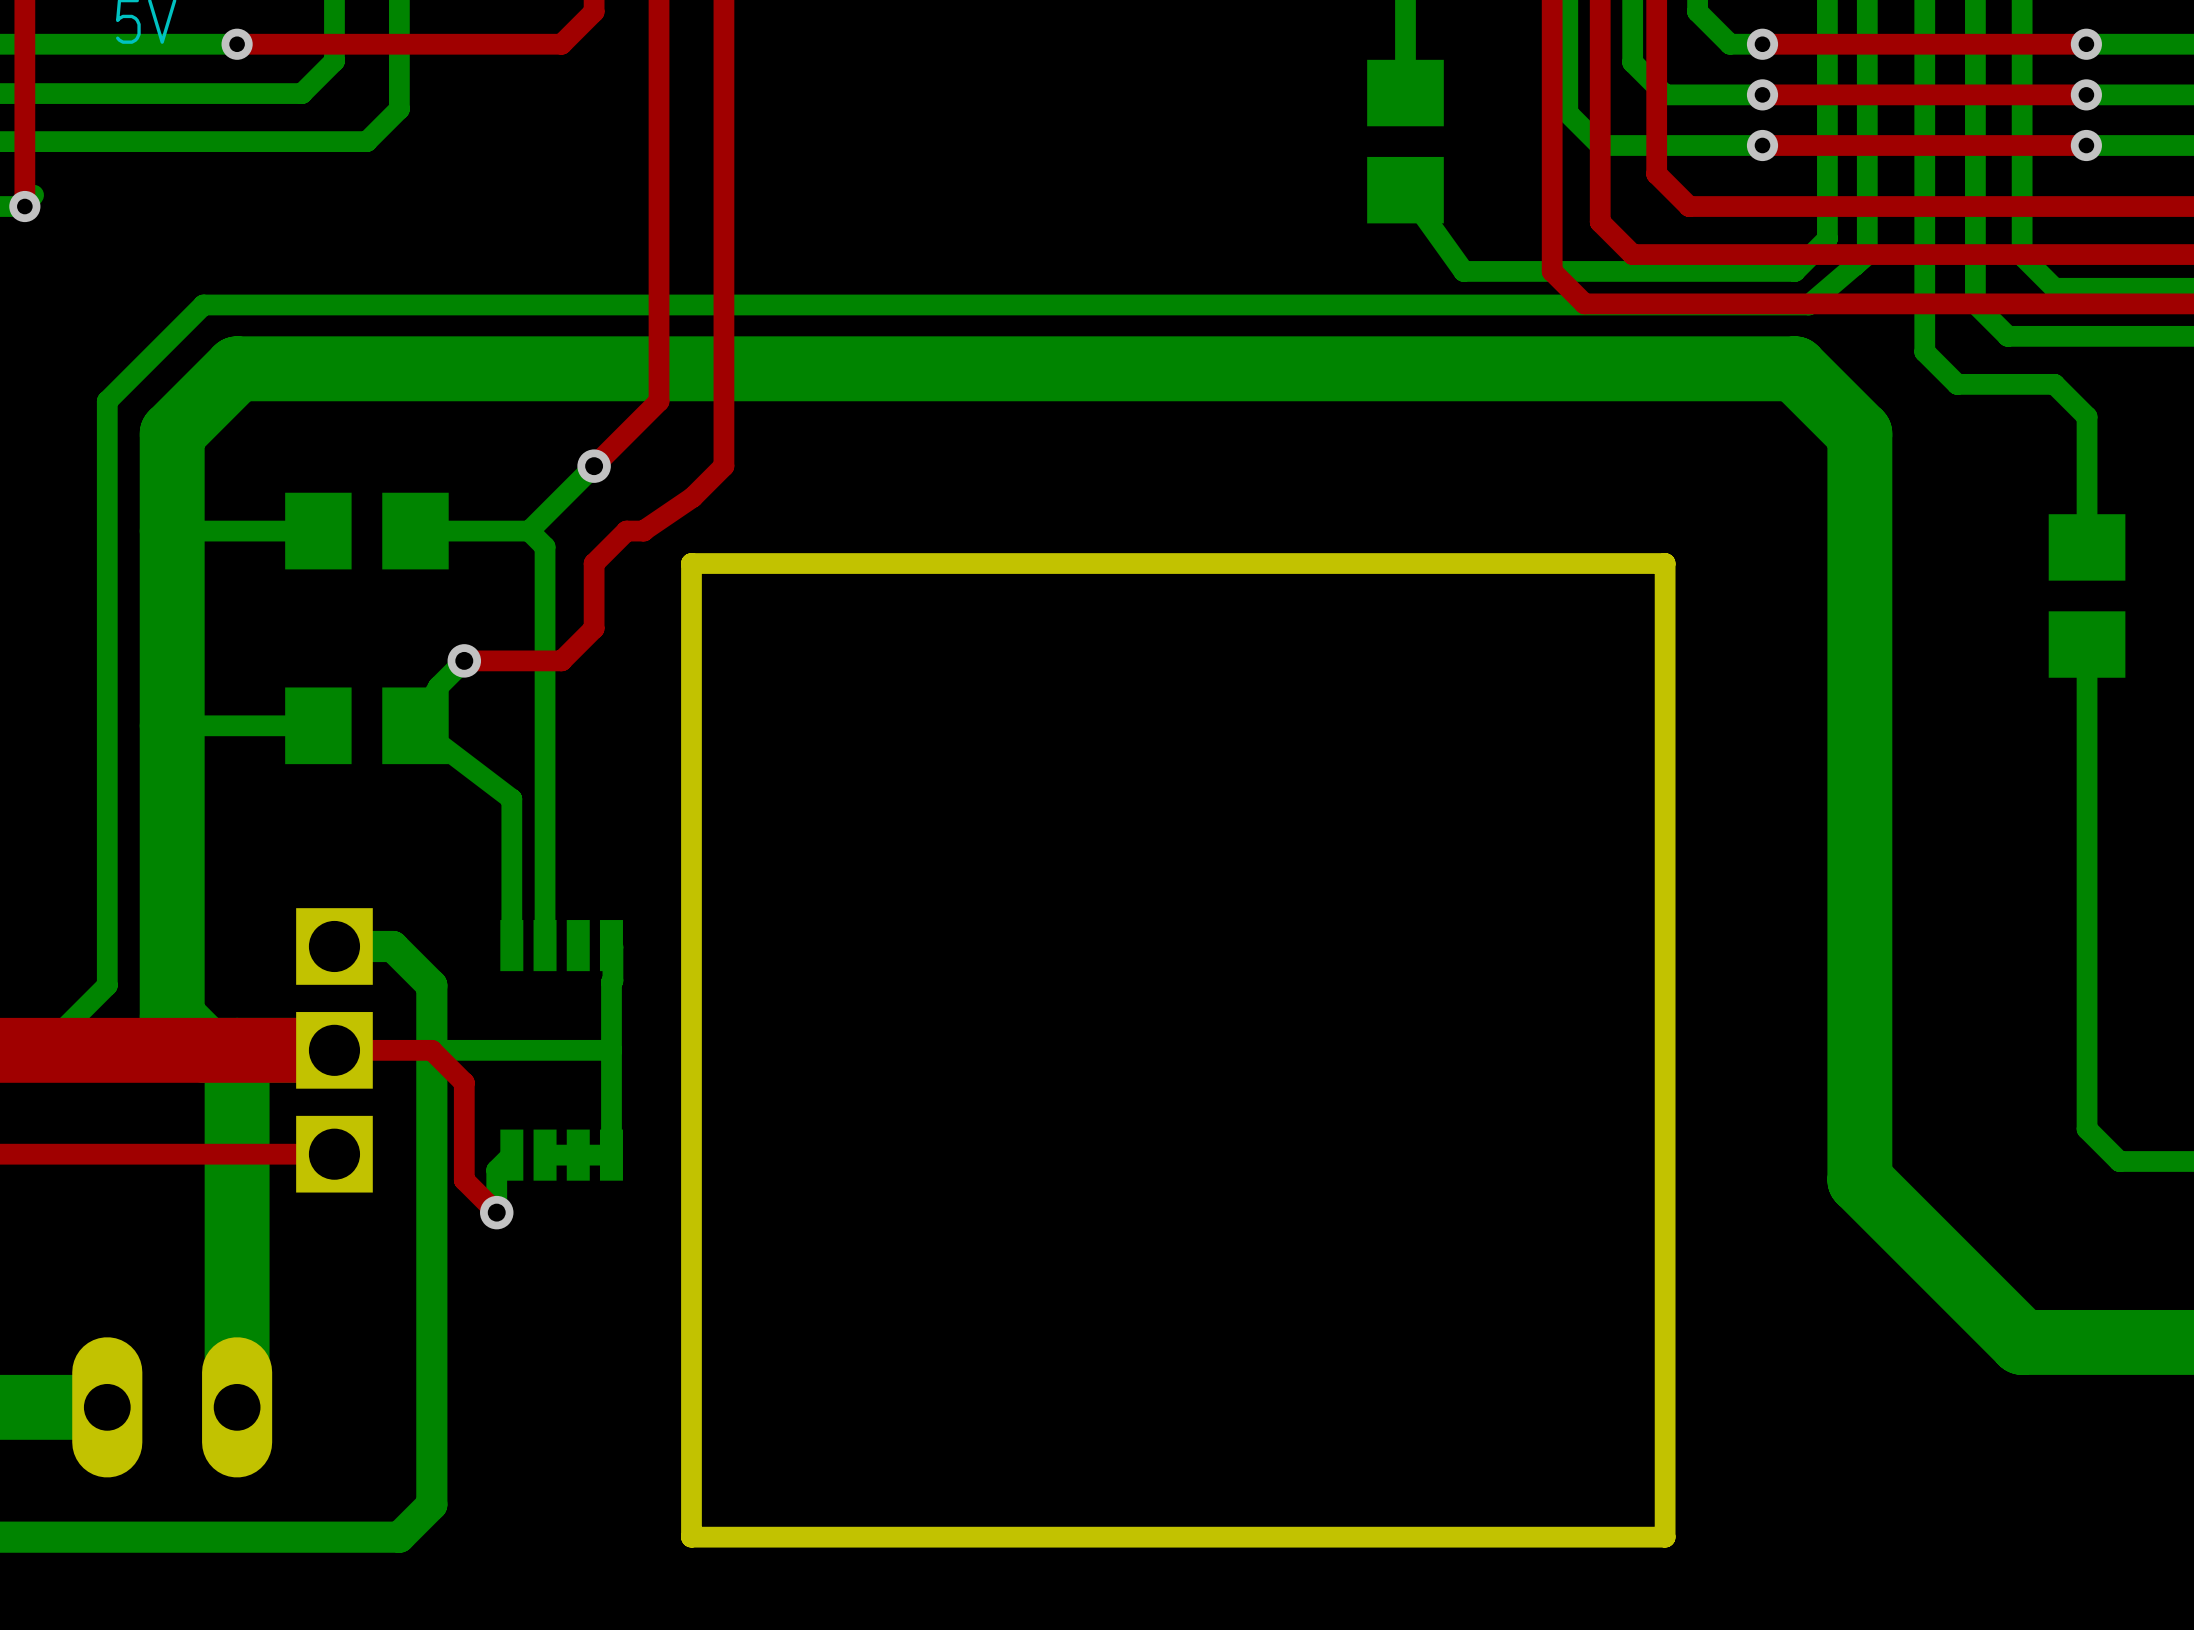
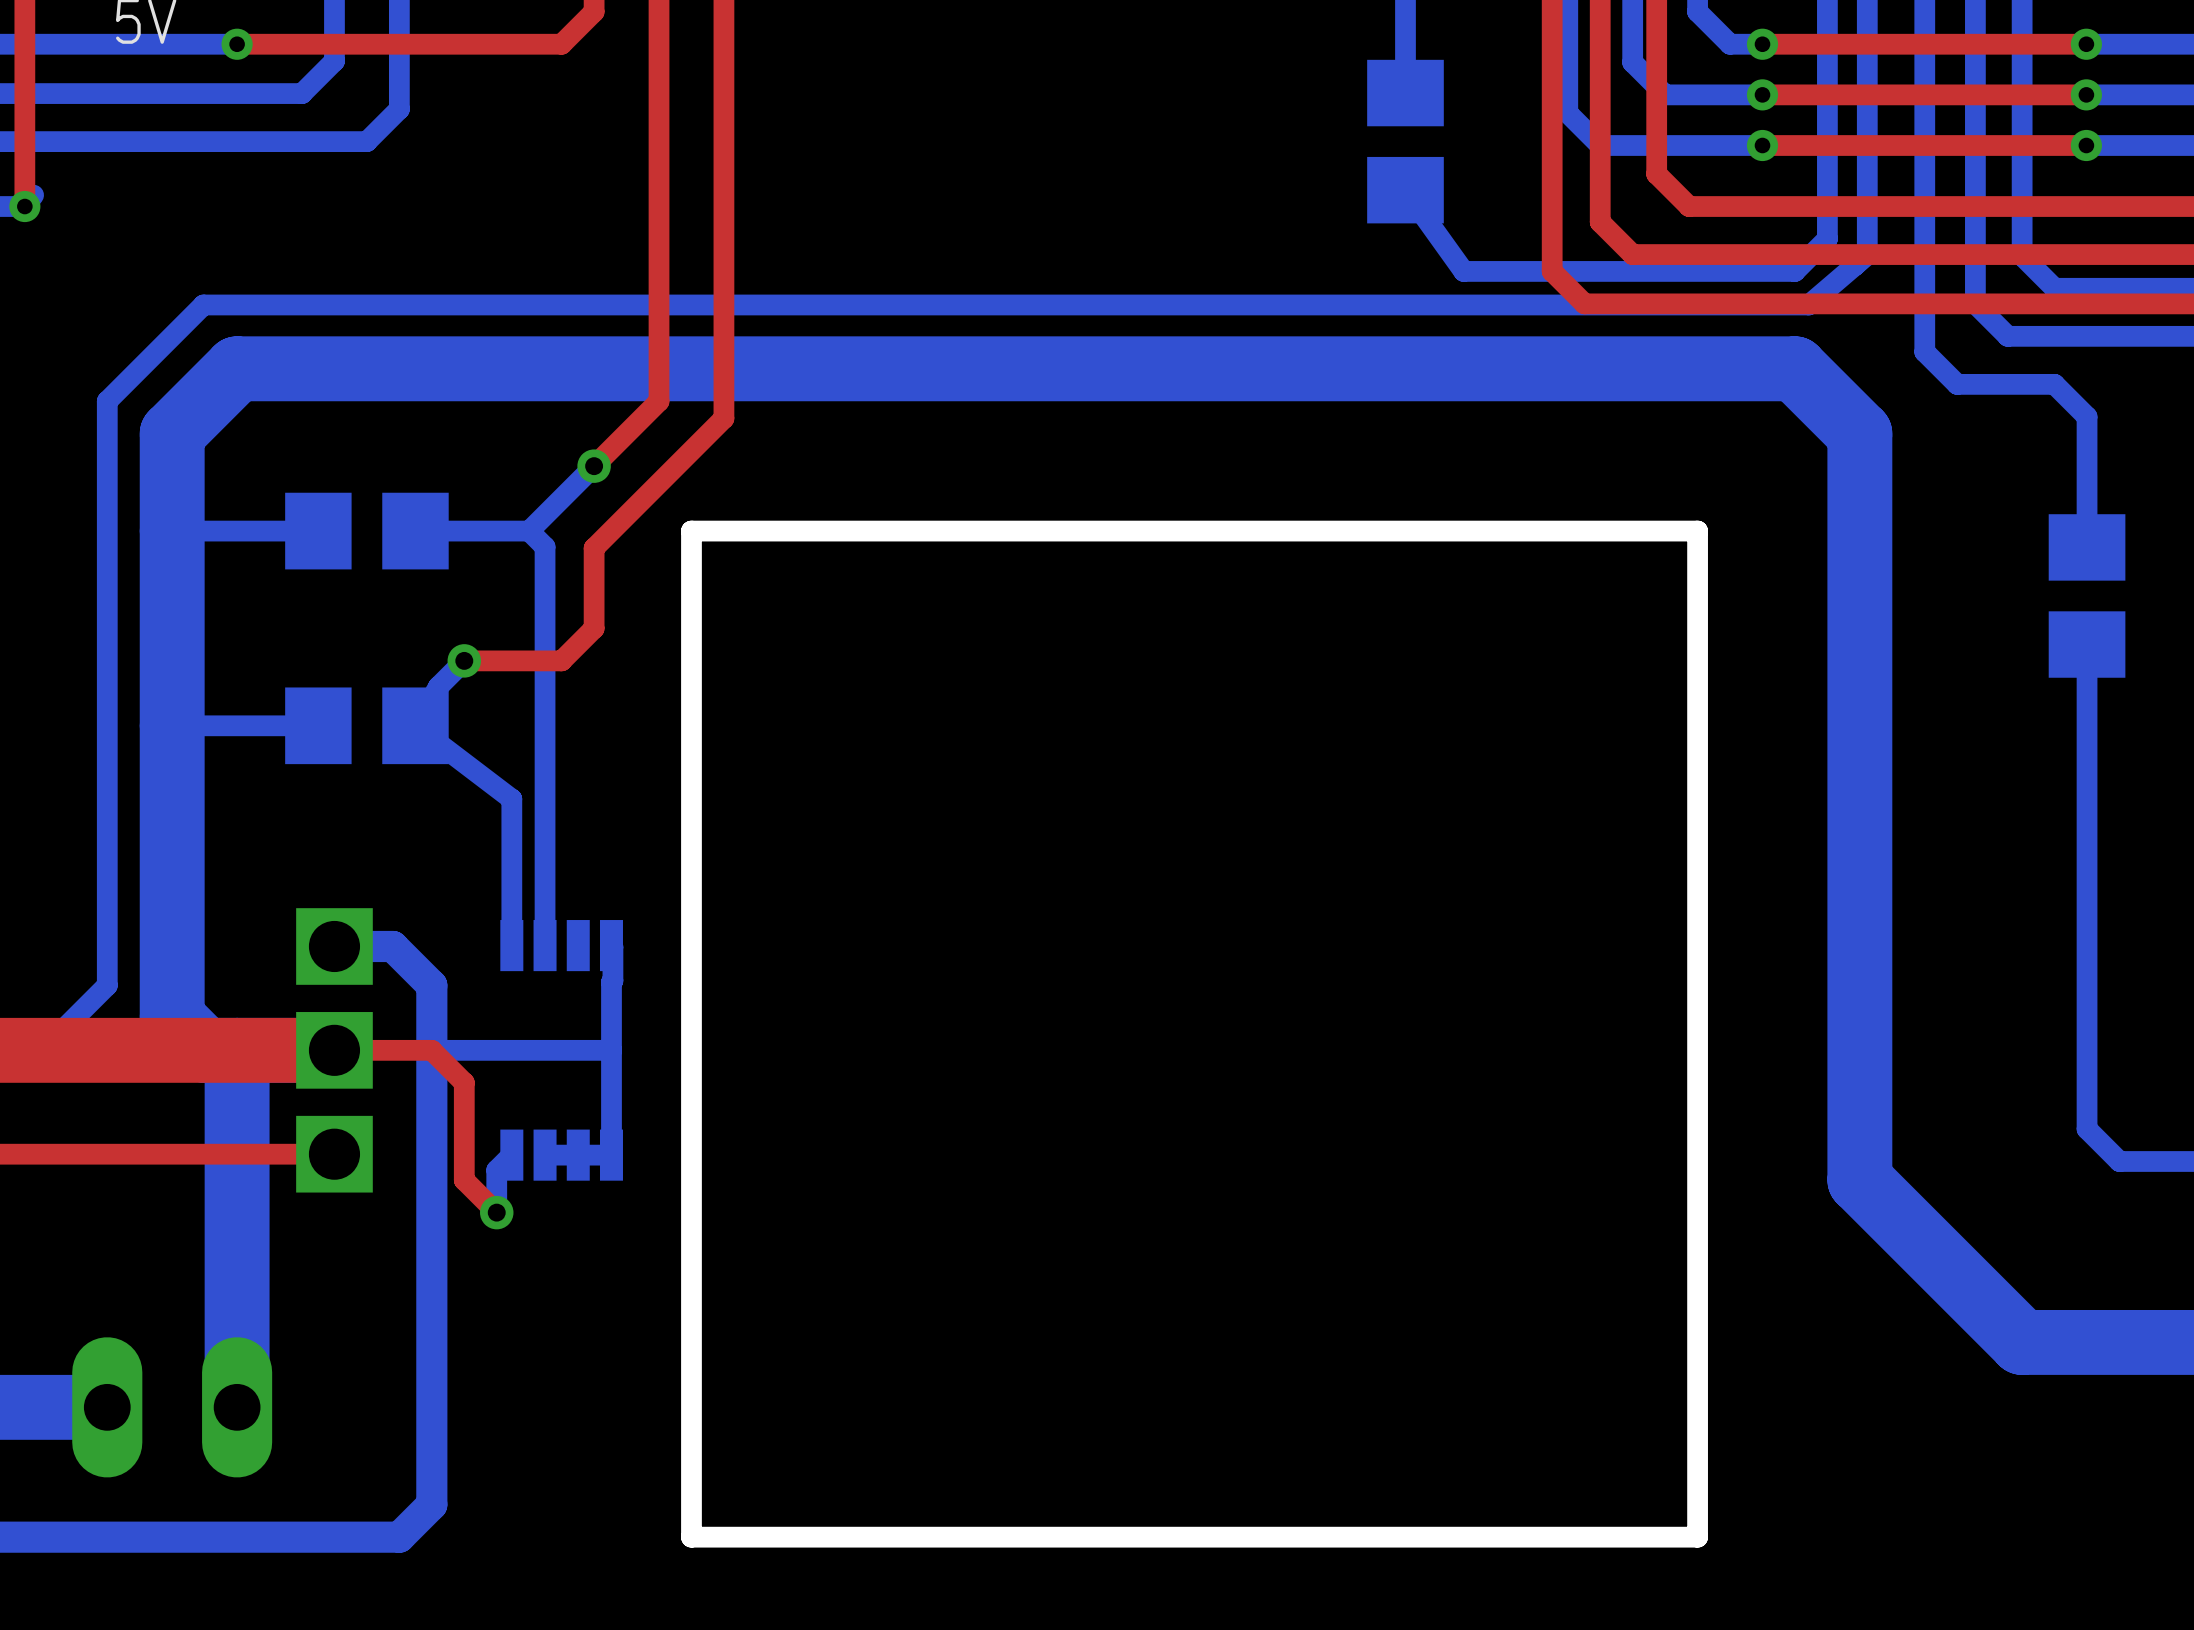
top track: (723, 418) (723, 466) (692, 497) (643, 531) (626, 531) (594, 563) -> (723, 418) (594, 548) (594, 563)
board edge: (691, 563) (1665, 563) (1665, 1537) -> (691, 563) (691, 531) (1697, 531) (1697, 1537) (1665, 1537)

